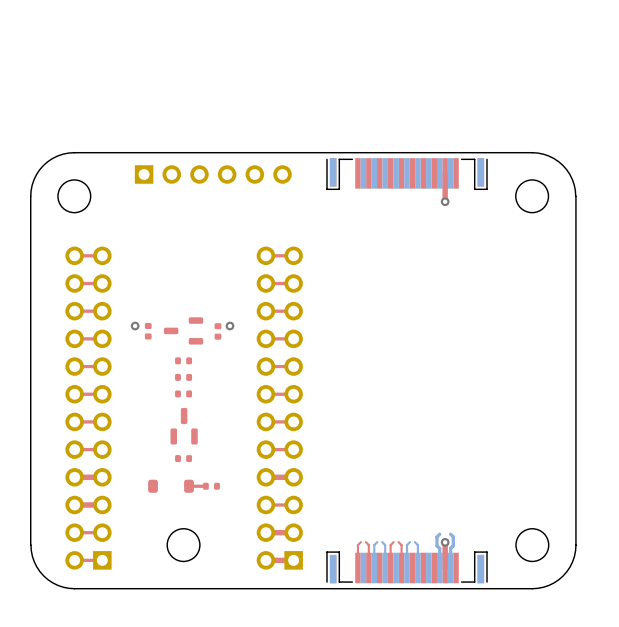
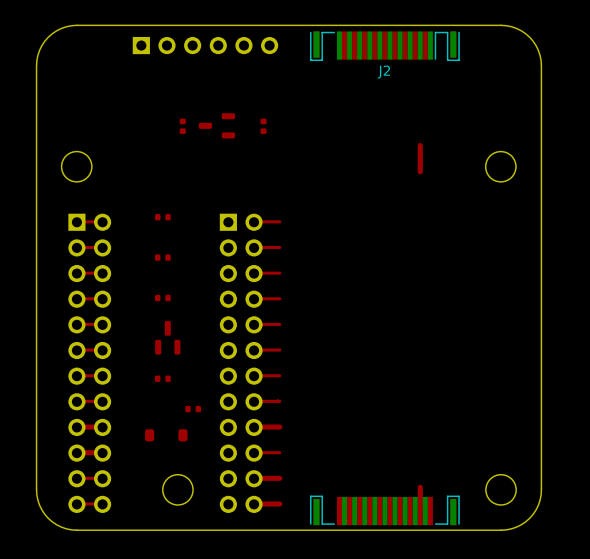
part: none -> (182, 126)
part: none -> (263, 126)
part position: (213, 174) -> (205, 45)
J2 side: top (407, 174) -> bottom (384, 46)
board edge: (575, 196) (572, 179) (562, 165) (553, 158) (537, 153) (74, 152) (52, 158) (36, 174) (30, 196) (30, 545) -> (541, 166) (540, 55) (529, 37) (511, 26) (76, 25) (56, 30) (41, 45) (36, 65) (36, 489)
via: (445, 201) -> none
part: none -> (162, 217)
part: none -> (162, 257)
via: (135, 326) -> none
via: (229, 326) -> none
part position: (183, 330) -> (216, 125)
part: (148, 331) -> none
part: (217, 331) -> none
part: none -> (162, 297)
part: (183, 360) -> none
part: (183, 377) -> none
part: (183, 393) -> none
part rotation: 0° (88, 408) -> 180° (89, 363)
part rotation: 0° (279, 408) -> 180° (241, 363)
part: none -> (162, 378)
part position: (184, 426) -> (167, 337)
part: none -> (193, 409)
part: (183, 458) -> none
top track: (205, 486) (188, 486) -> none
part: (211, 486) -> none
bottom track: (439, 534) (436, 536) (436, 545) (439, 548) (439, 567) -> none
bottom track: (450, 534) (453, 536) (453, 545) (450, 548) (450, 567) -> none
top track: (360, 542) (357, 545) (357, 567) -> none
top track: (365, 542) (368, 545) (368, 567) -> none
bottom track: (377, 542) (374, 545) (374, 567) -> none
bottom track: (382, 542) (385, 545) (385, 567) -> none
top track: (393, 542) (390, 545) (390, 567) -> none
top track: (398, 542) (401, 545) (401, 567) -> none
bottom track: (410, 542) (407, 545) (407, 567) -> none
bottom track: (414, 542) (417, 545) (417, 567) -> none
via: (445, 542) -> none

